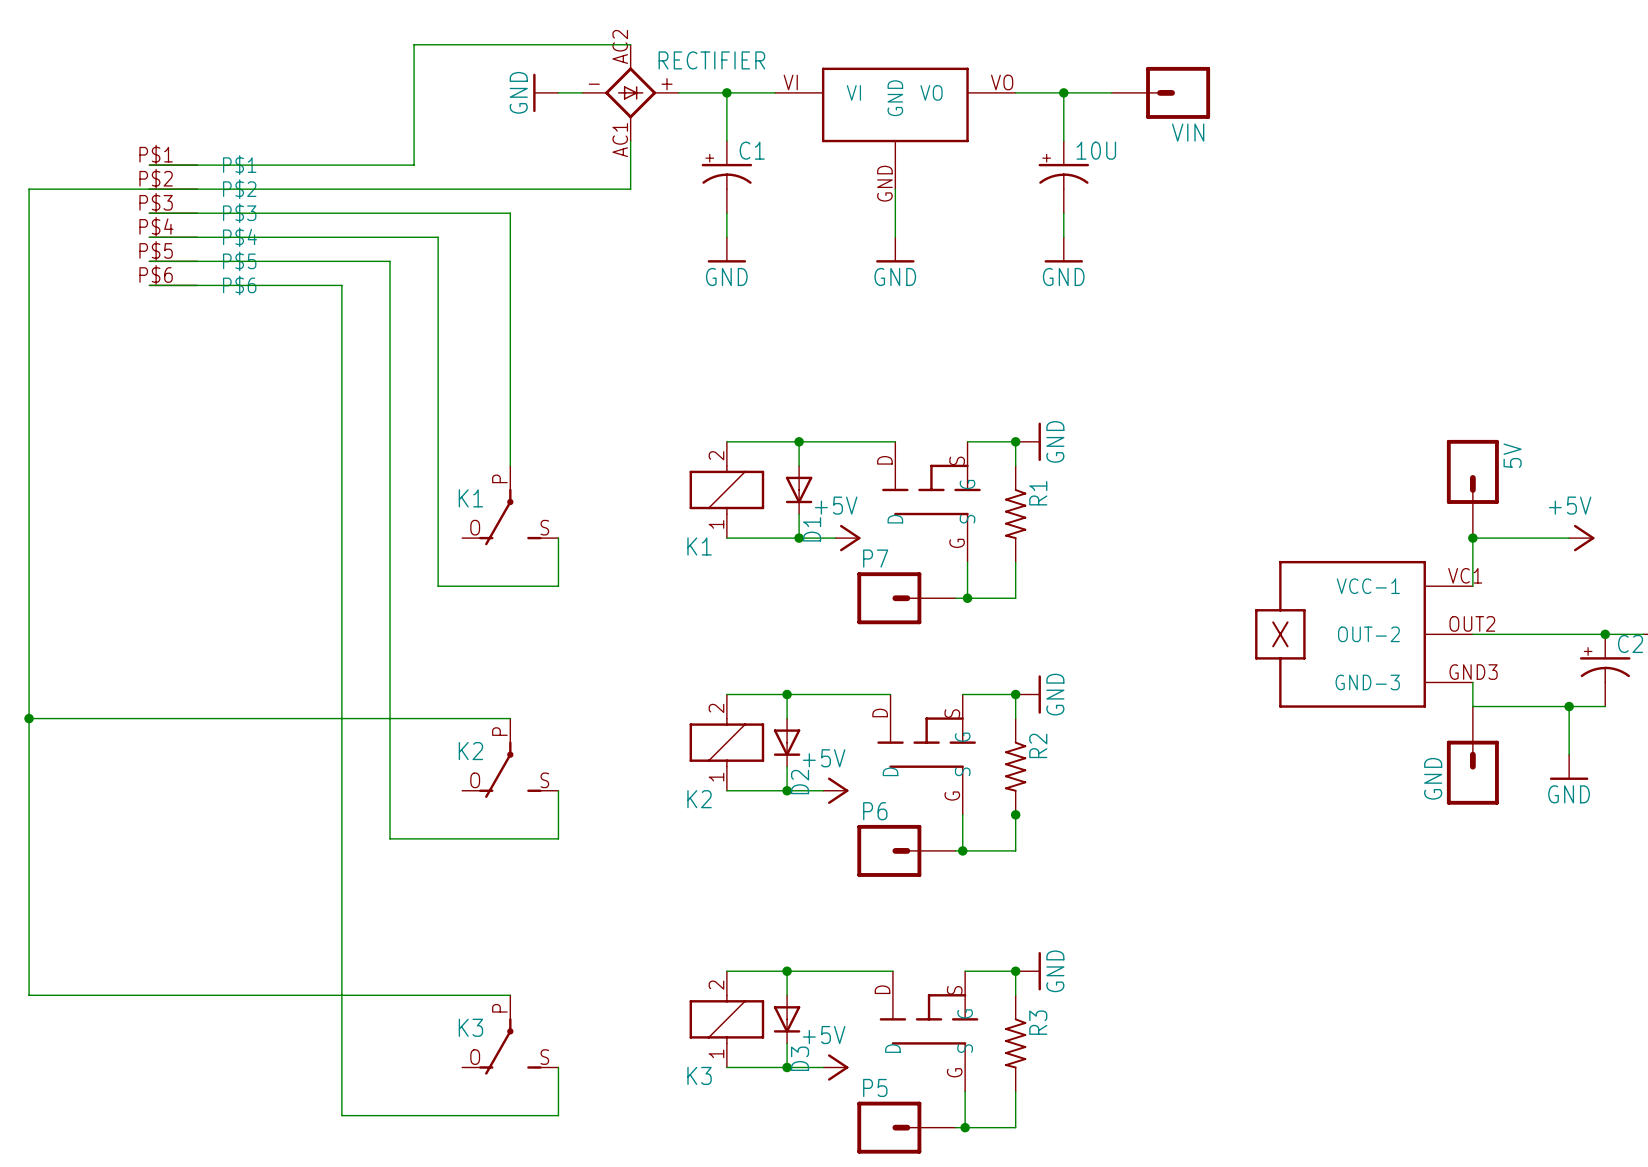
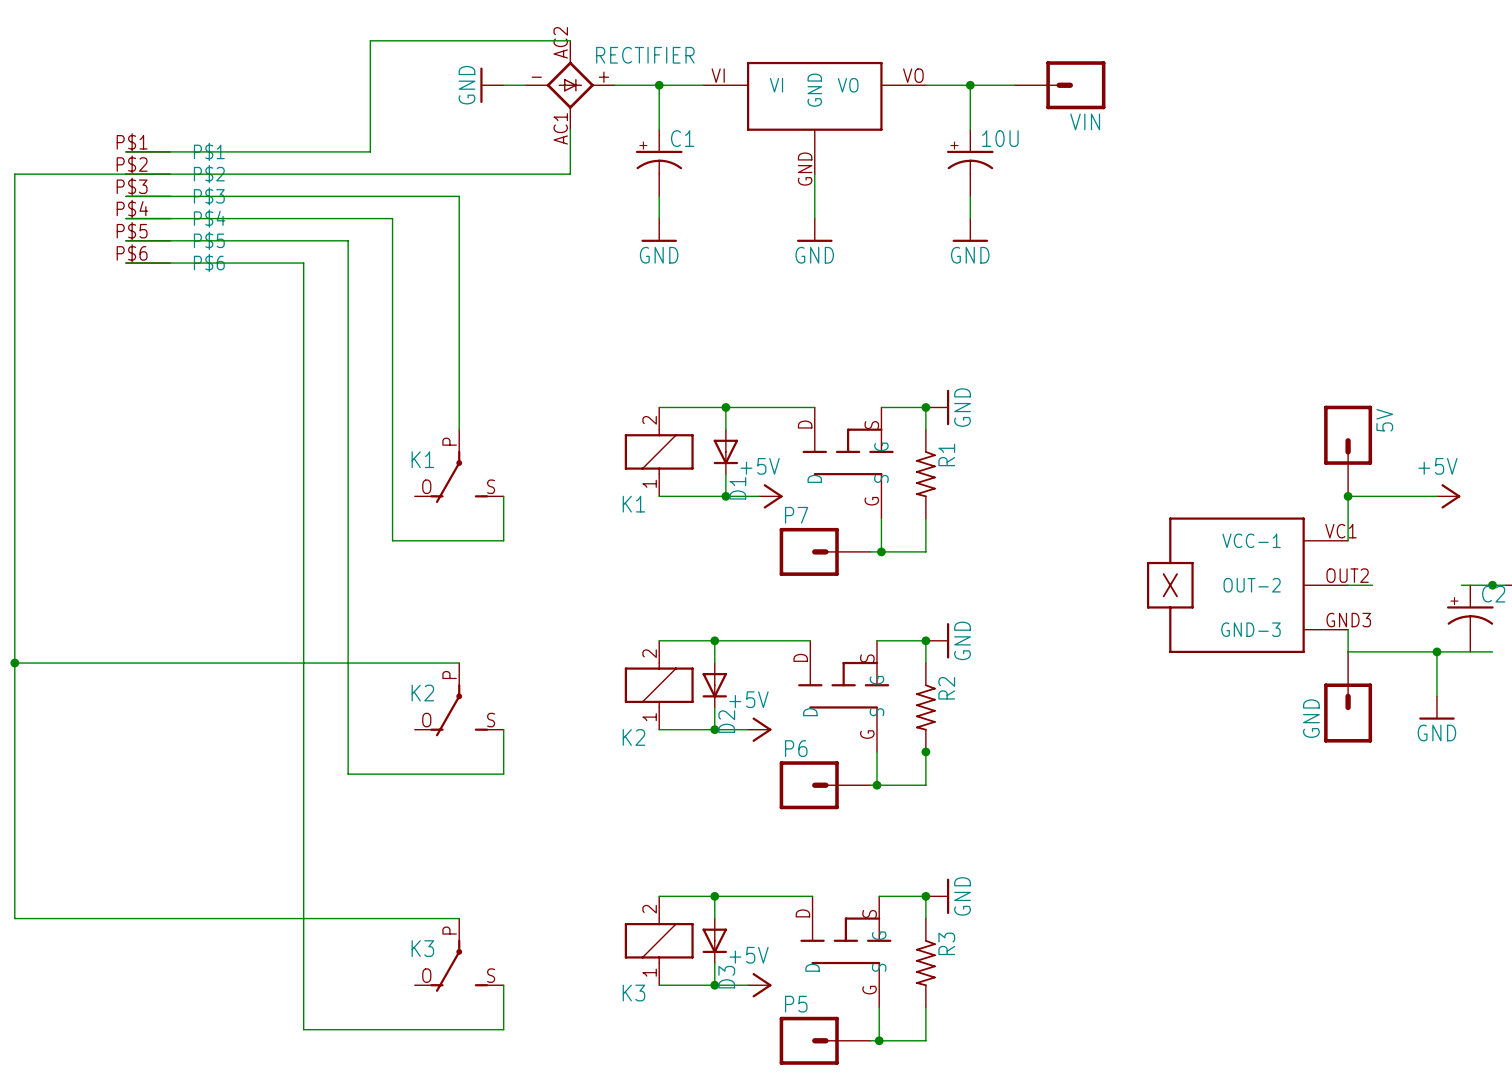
wire: (1499, 634) (1595, 634) -> none
junction position: (1605, 634) -> (1492, 585)
wire: none -> (1470, 651) (1492, 651)

